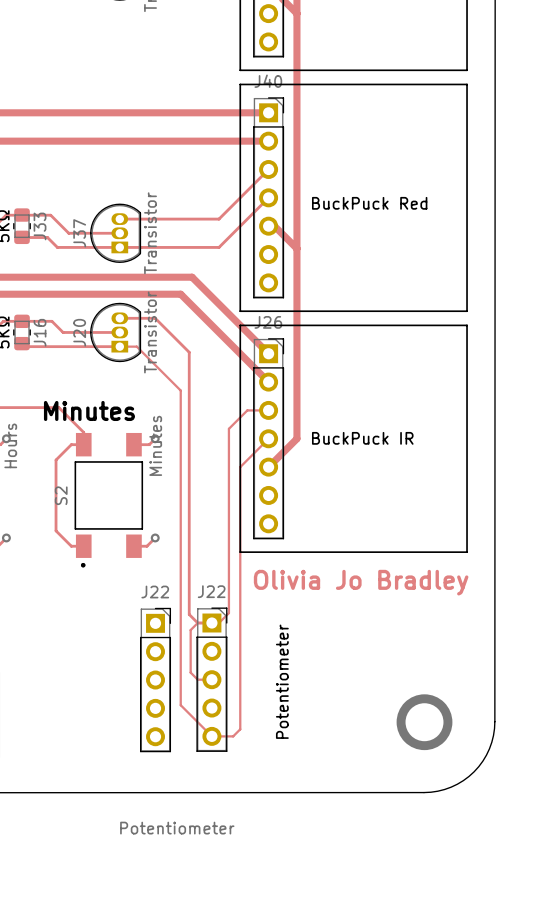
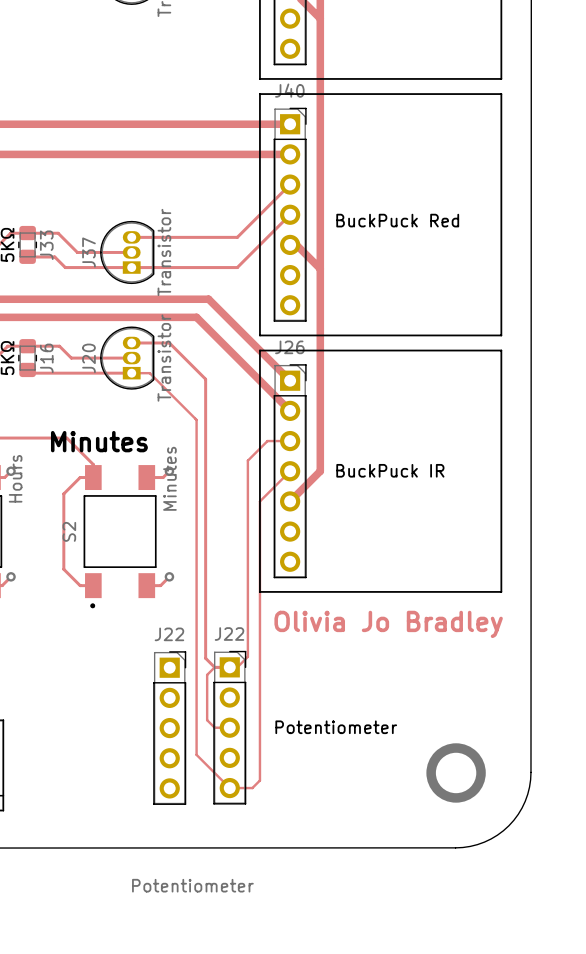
J22 value rotation: 0° (282, 681) -> 90° clockwise (336, 727)

